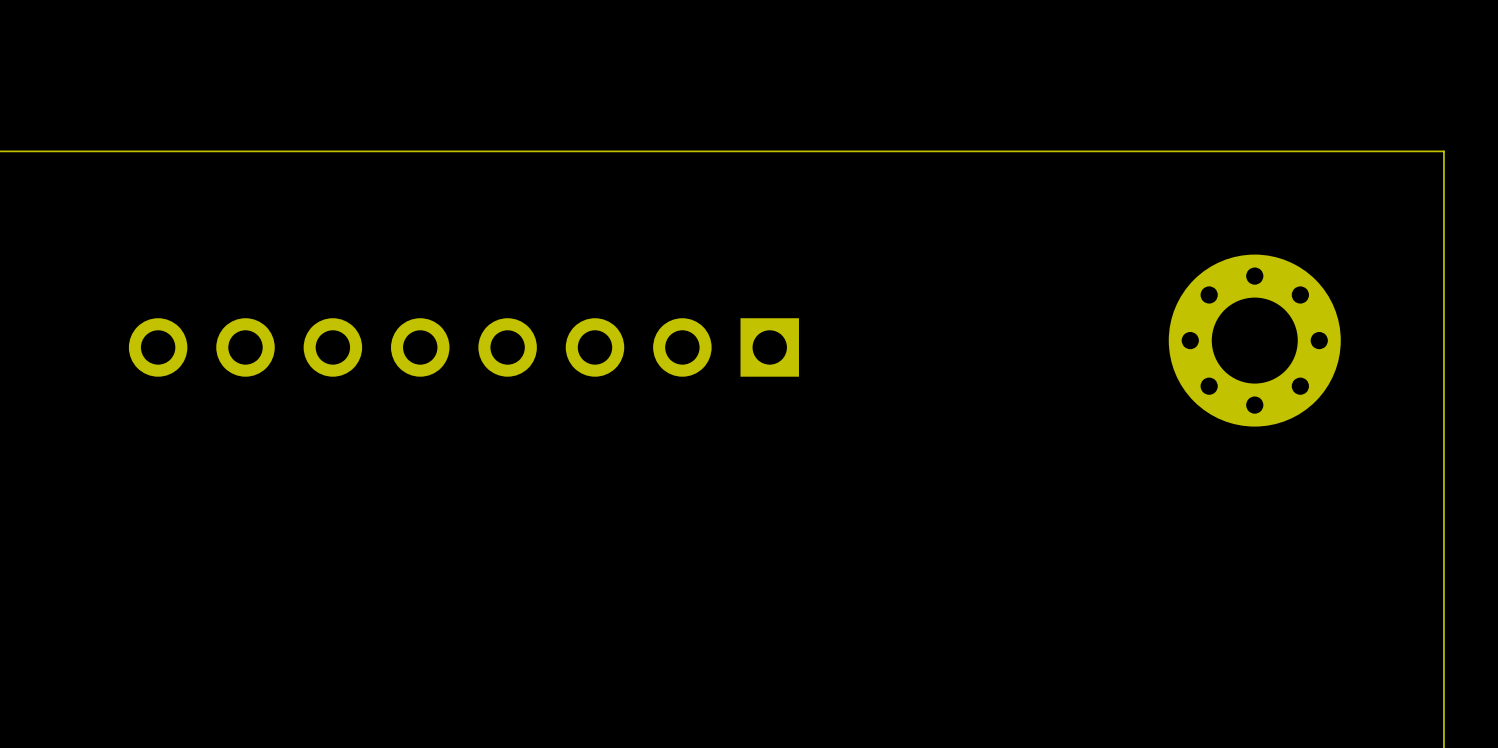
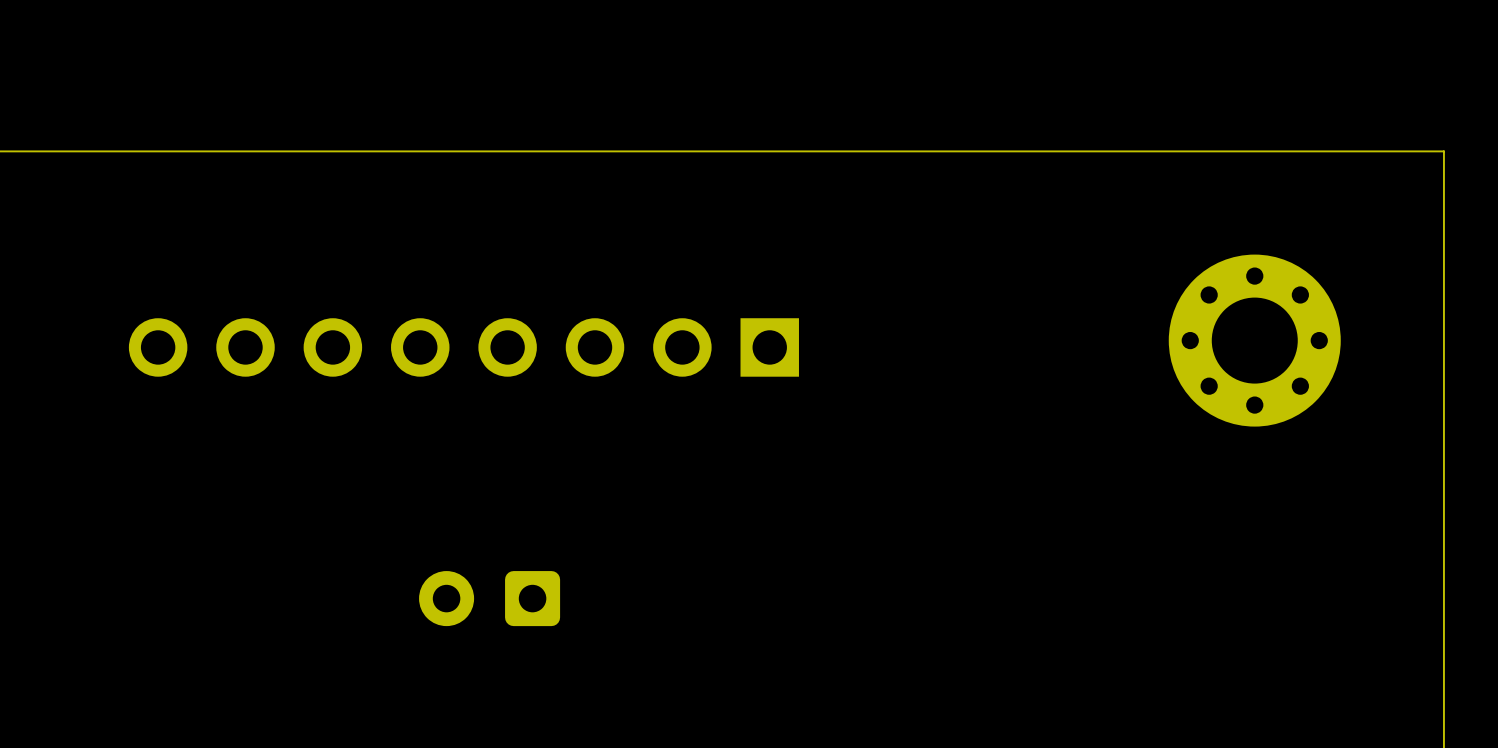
part: none -> (489, 598)

